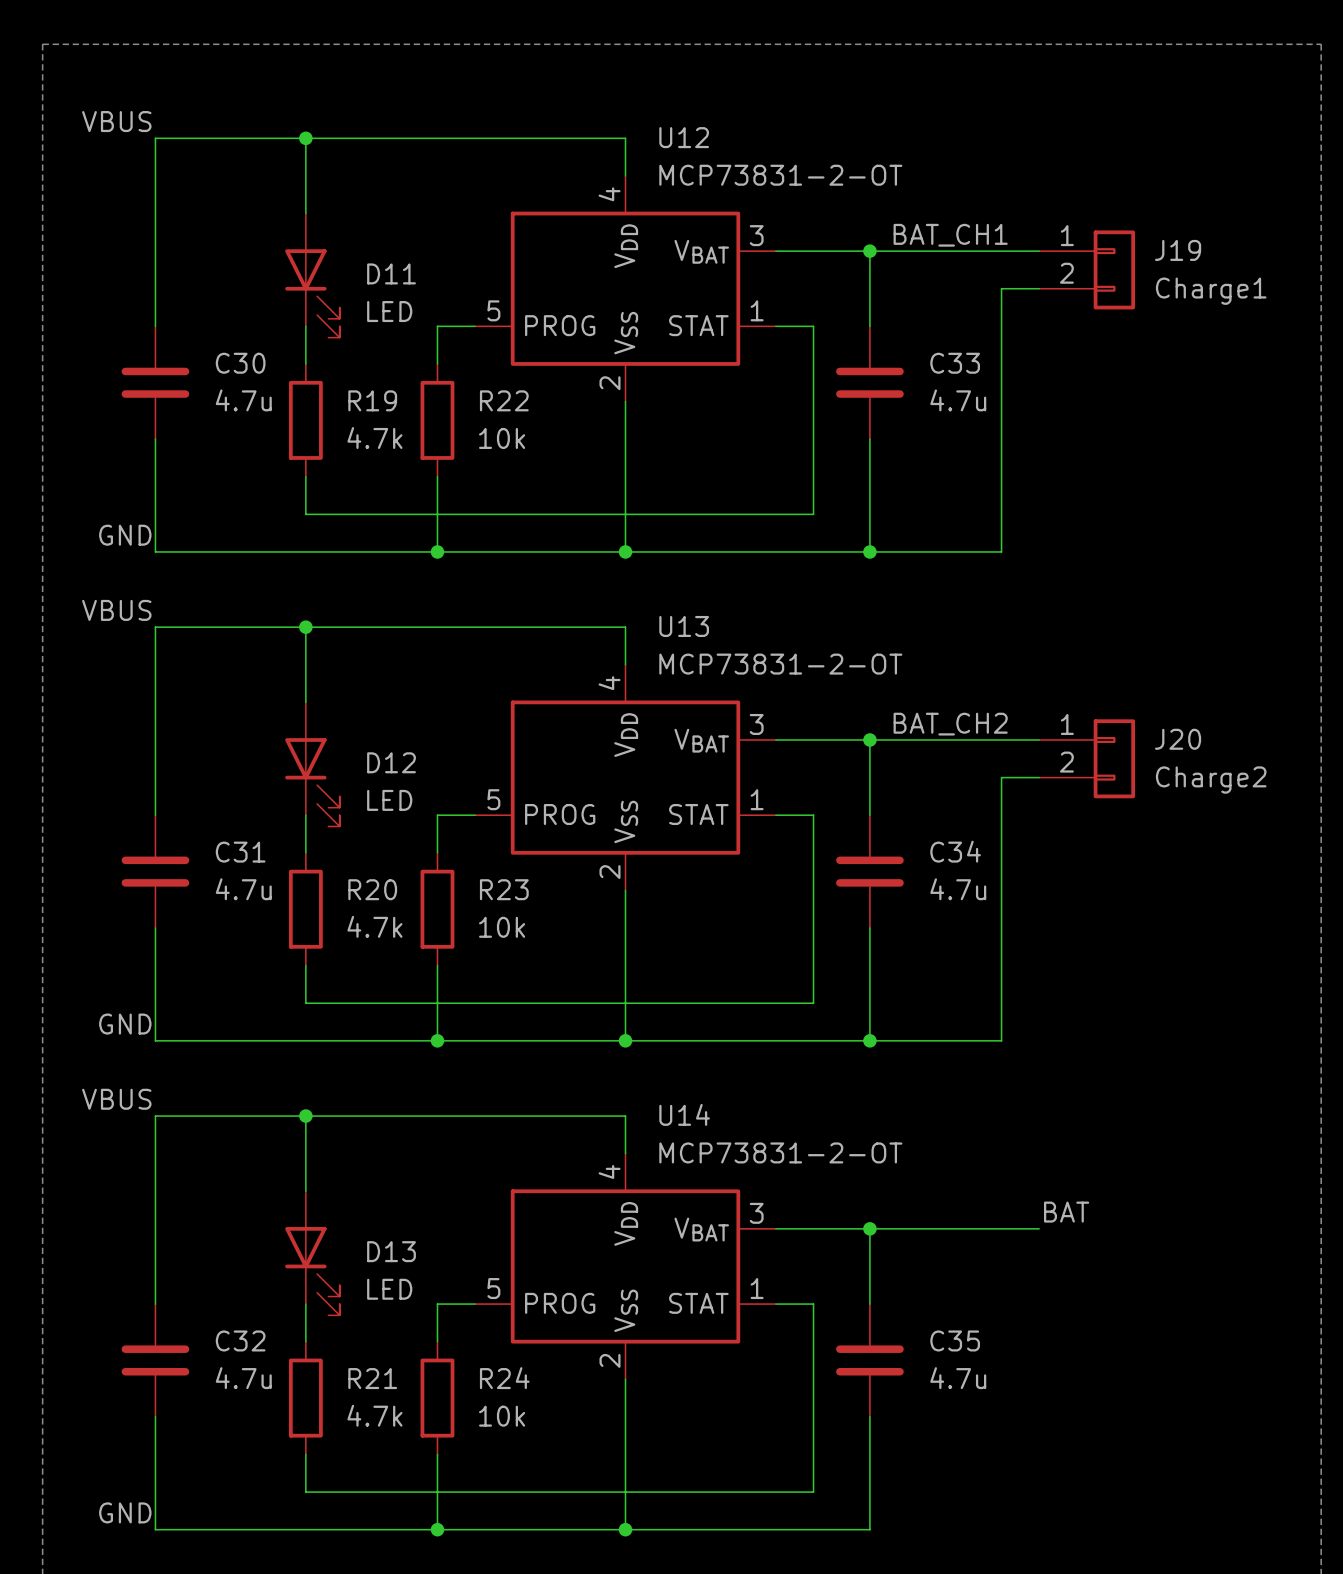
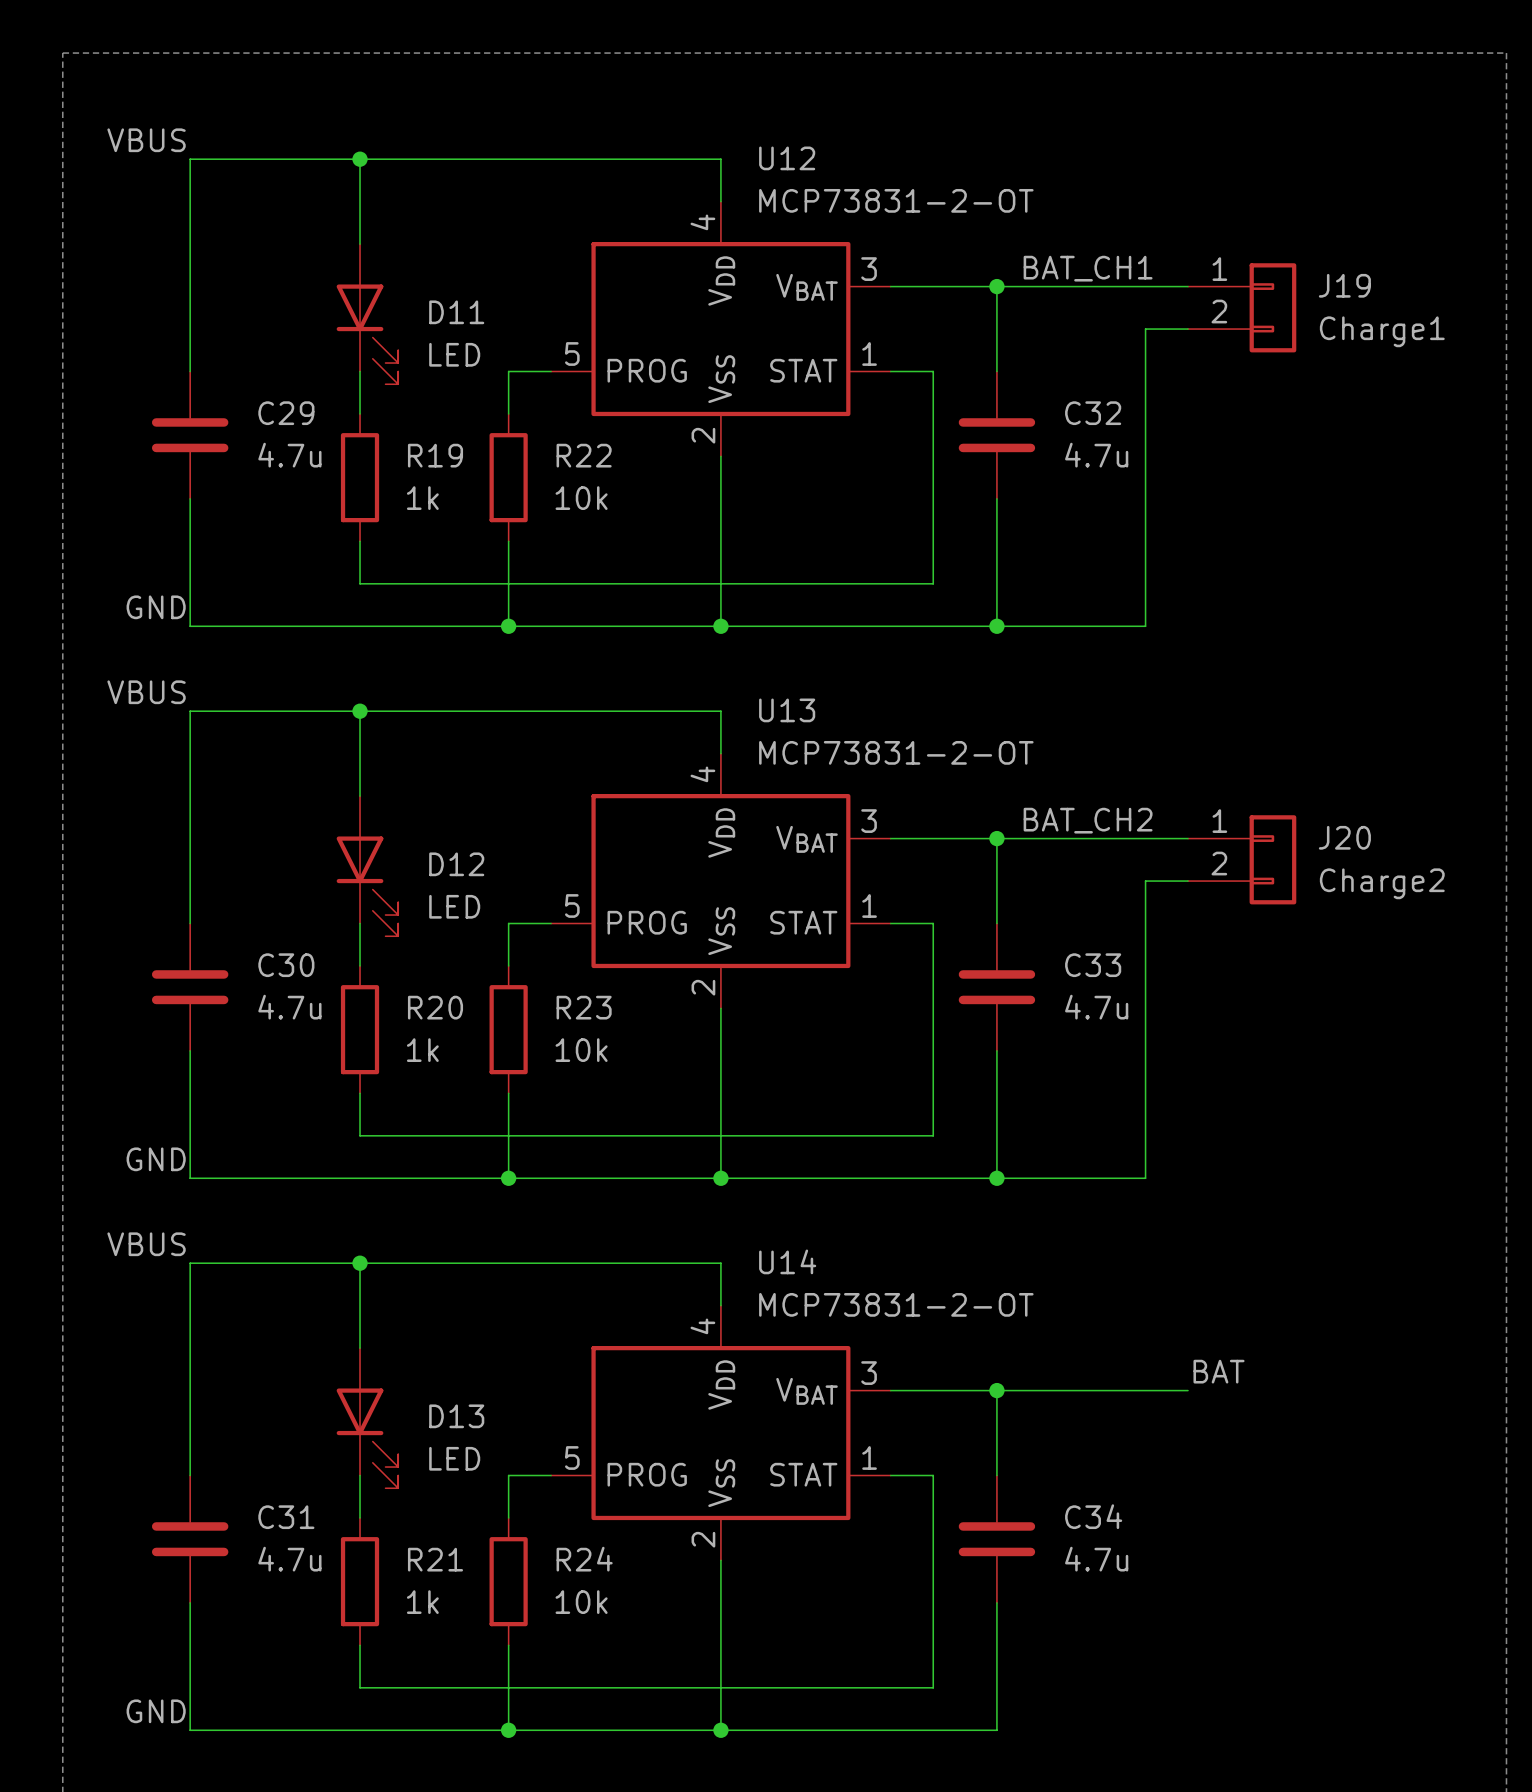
C30 name: C30 (240, 363) -> C29 (286, 413)
C33 name: C33 (955, 363) -> C32 (1093, 413)
R19 value: 4.7k (374, 438) -> 1k (422, 498)
C34 name: C34 (955, 851) -> C33 (1093, 965)
C31 name: C31 (240, 852) -> C30 (286, 965)
R20 value: 4.7k (374, 926) -> 1k (422, 1050)
C32 name: C32 (240, 1340) -> C31 (286, 1517)
C35 name: C35 (955, 1340) -> C34 (1093, 1516)
R21 value: 4.7k (374, 1415) -> 1k (422, 1602)

